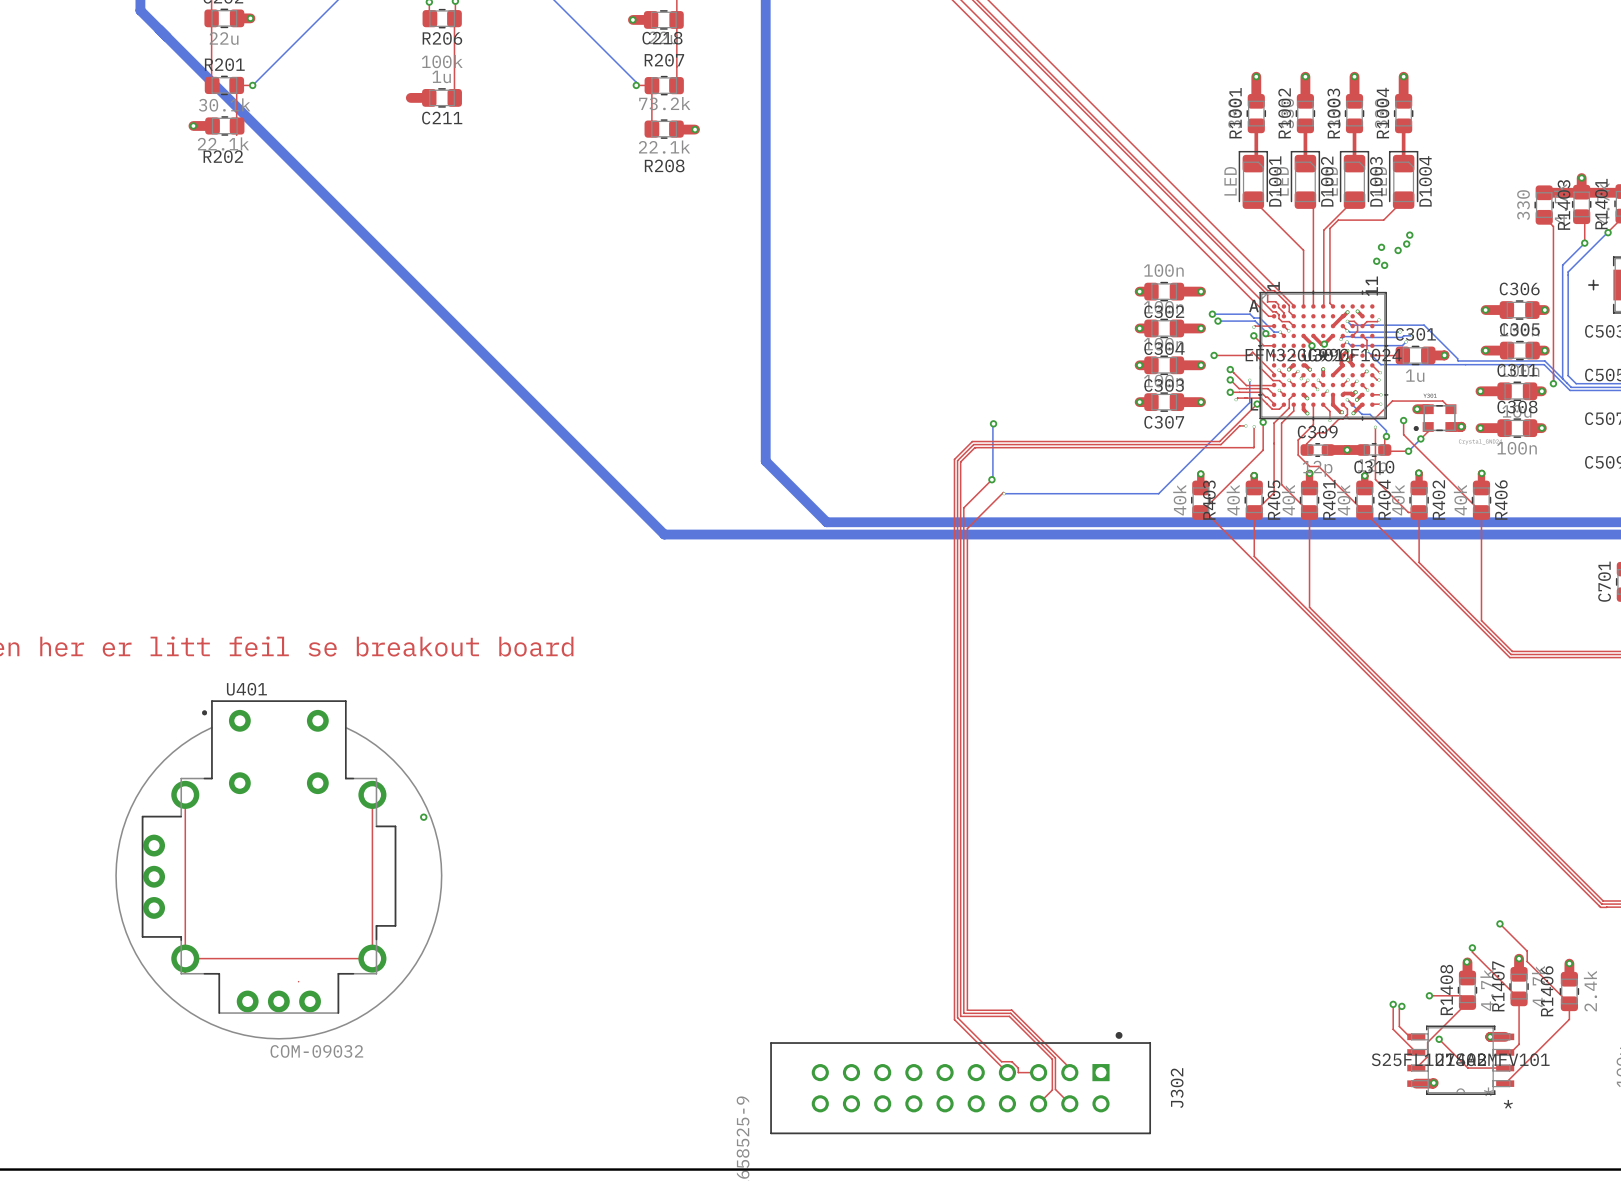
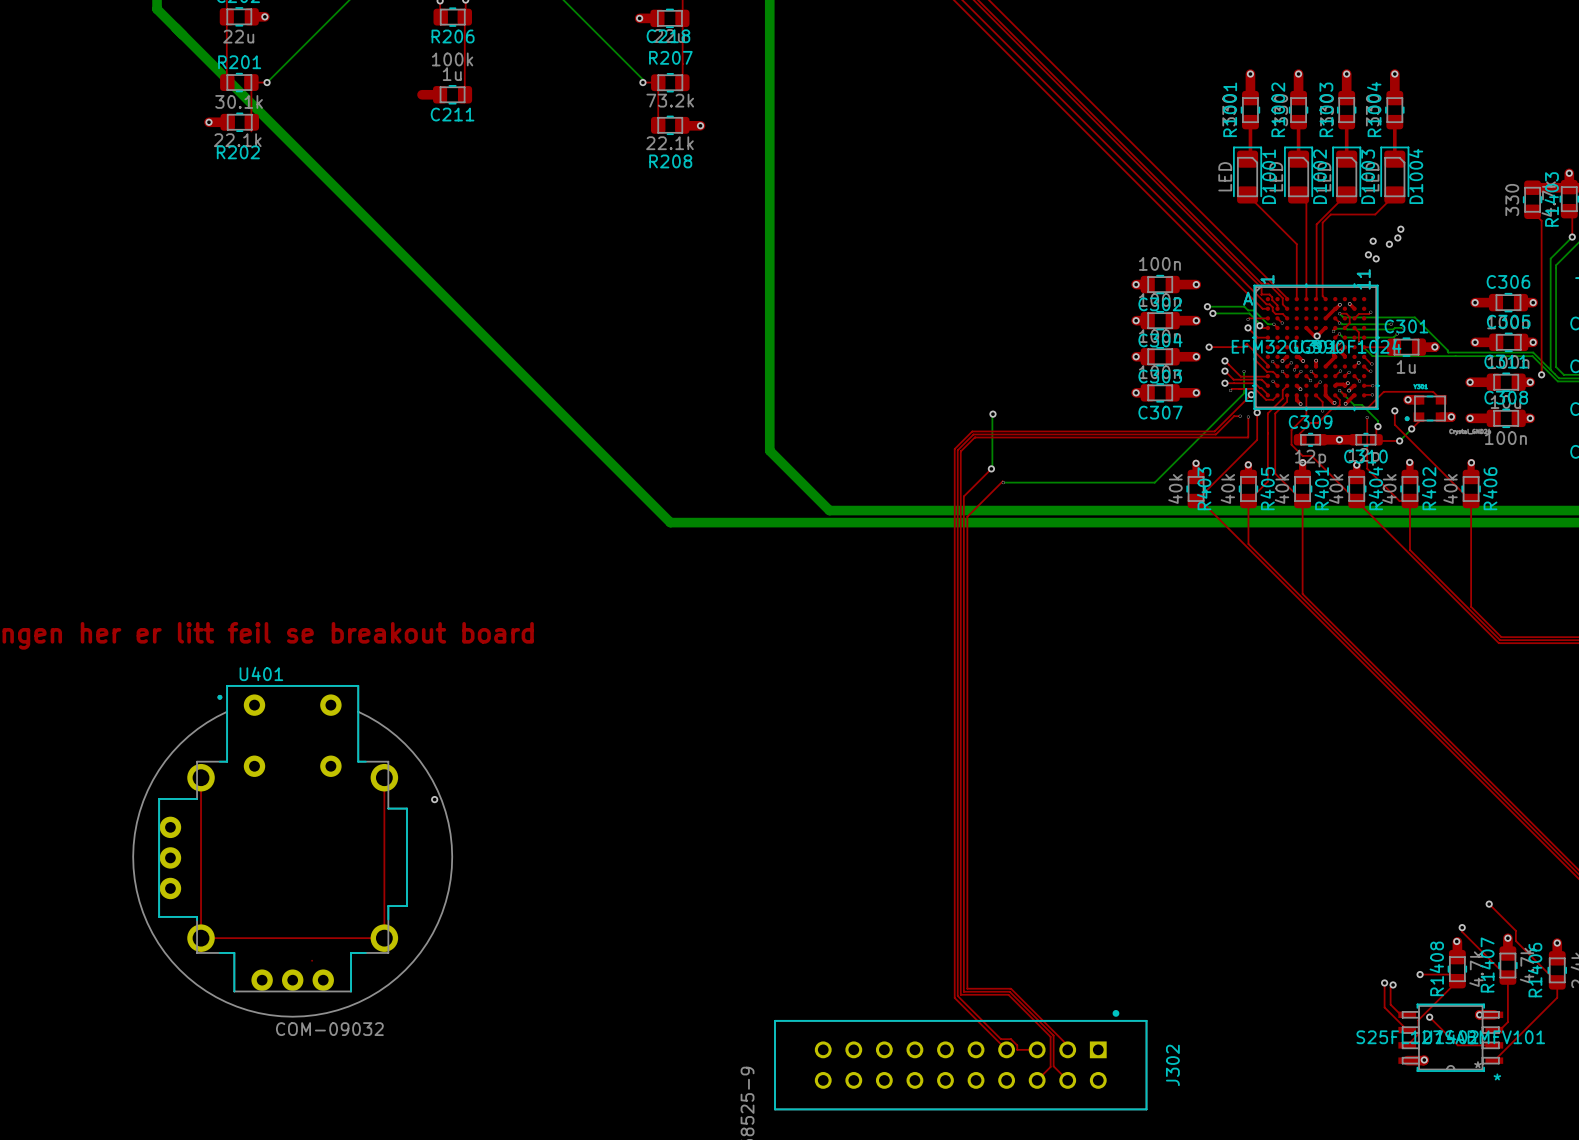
top track: (1303, 335) (1311, 345) -> none
via: (1311, 345) -> none

